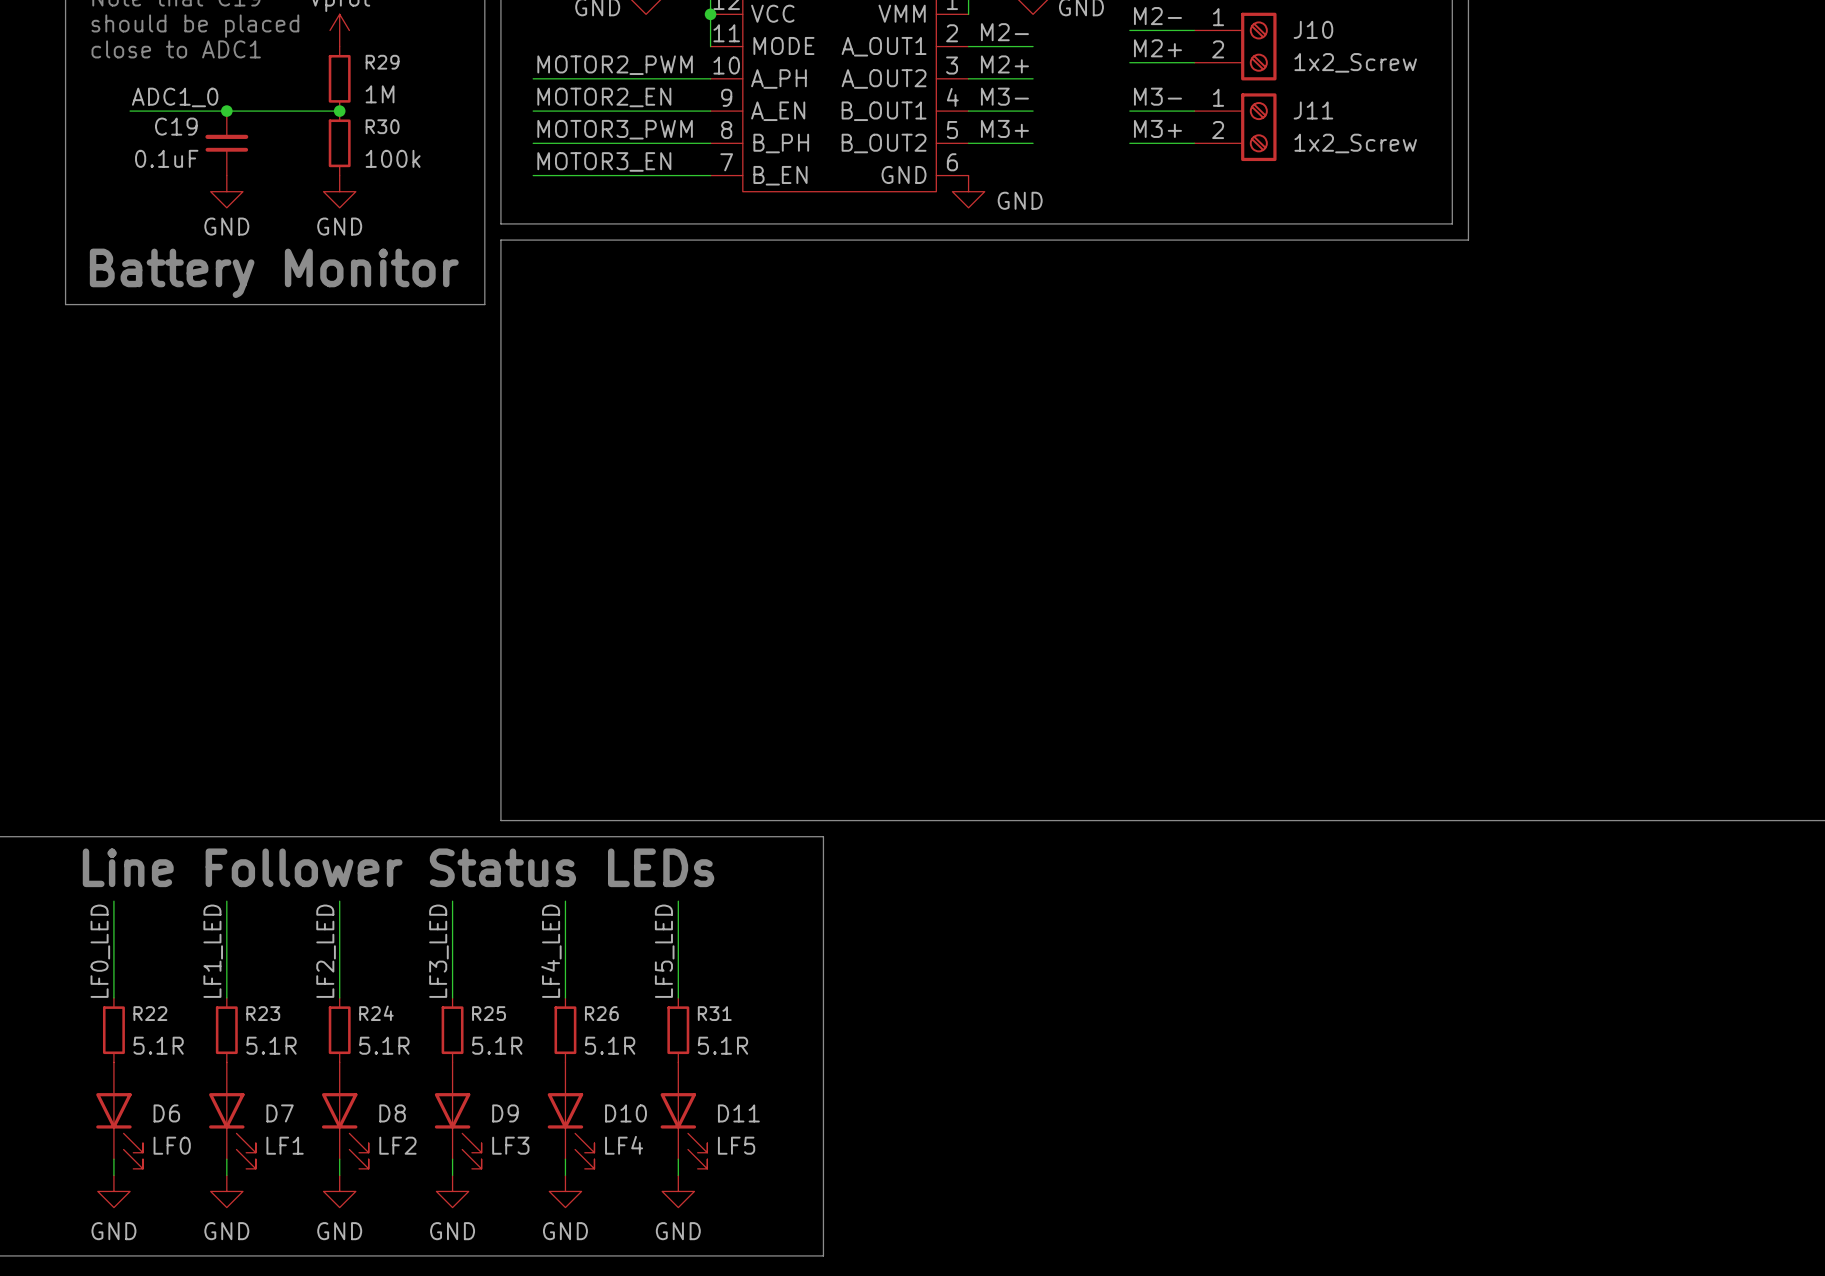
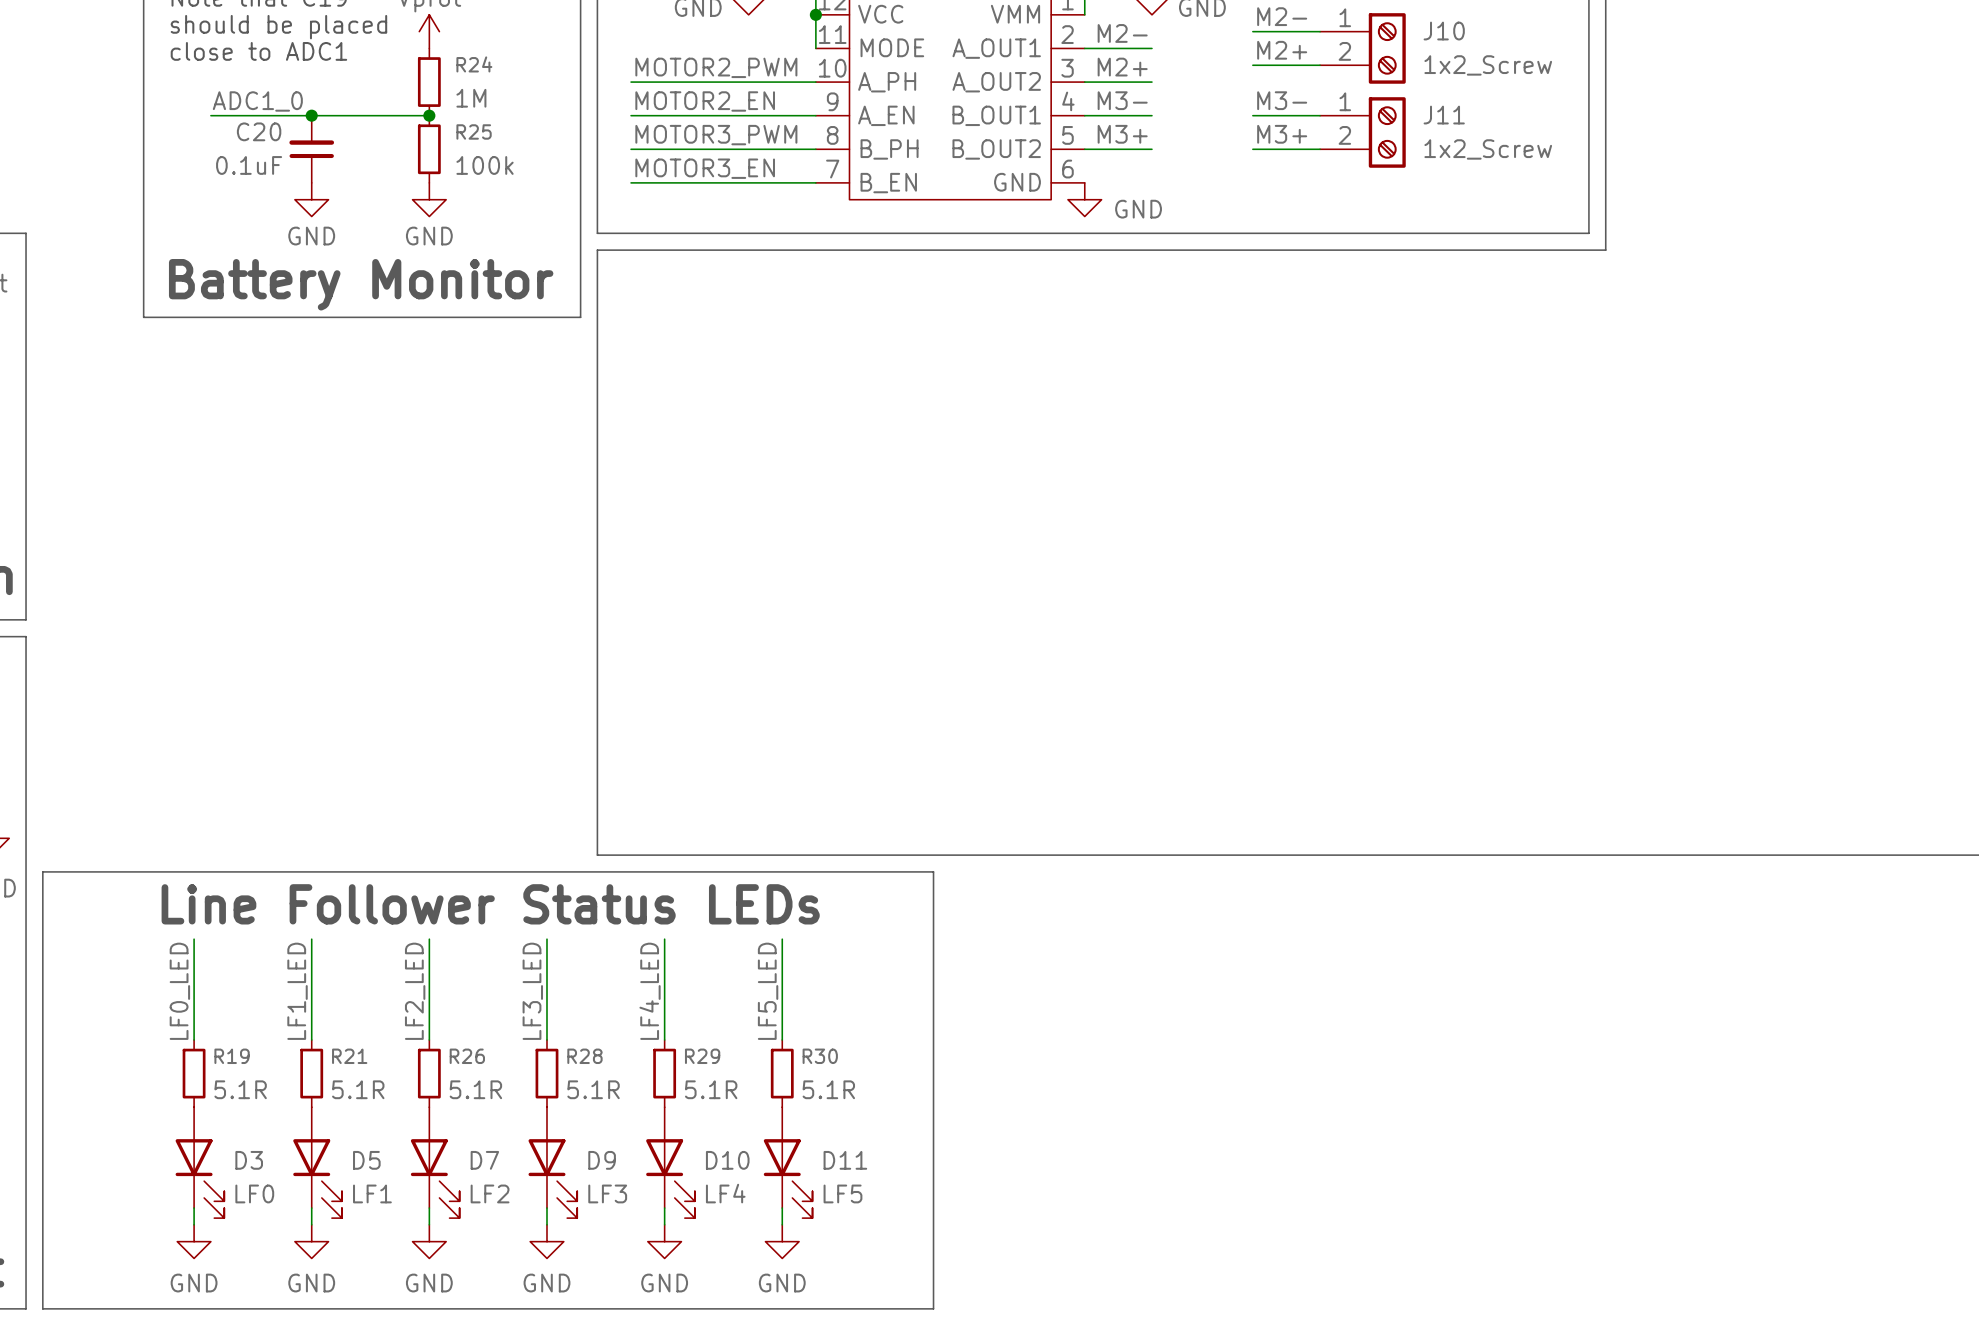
R29 name: R29 (382, 62) -> R24 (474, 64)
C19 name: C19 (176, 126) -> C20 (259, 131)
R30 name: R30 (382, 126) -> R25 (474, 131)
R22 name: R22 (150, 1013) -> R19 (232, 1056)
R23 name: R23 (263, 1013) -> R21 (349, 1056)
R24 name: R24 (376, 1013) -> R26 (467, 1056)
R25 name: R25 (489, 1013) -> R28 (584, 1056)
R26 name: R26 (601, 1013) -> R29 (702, 1056)
R31 name: R31 (714, 1013) -> R30 (820, 1056)
D6 name: D6 (166, 1113) -> D3 (249, 1160)
D7 name: D7 (280, 1113) -> D5 (366, 1160)
D8 name: D8 (392, 1113) -> D7 (484, 1160)

